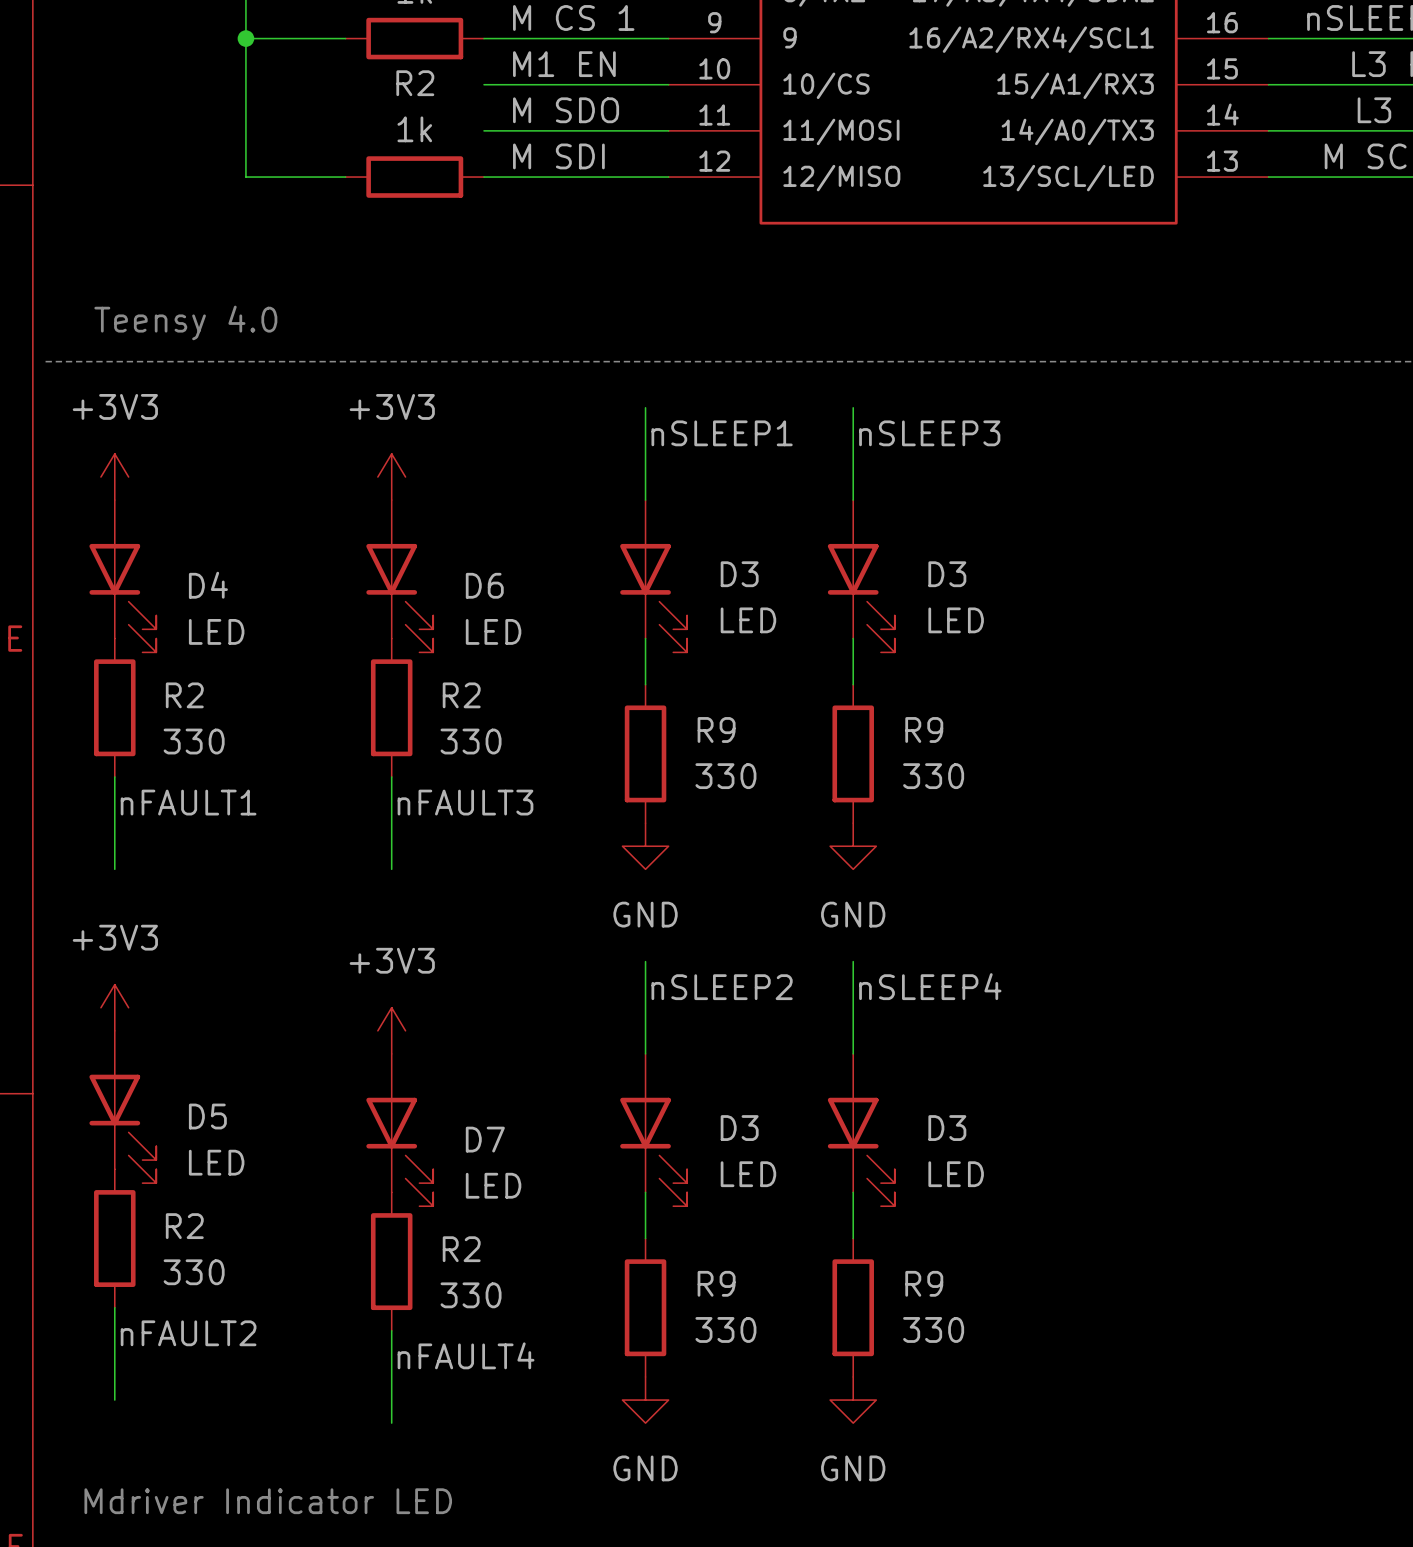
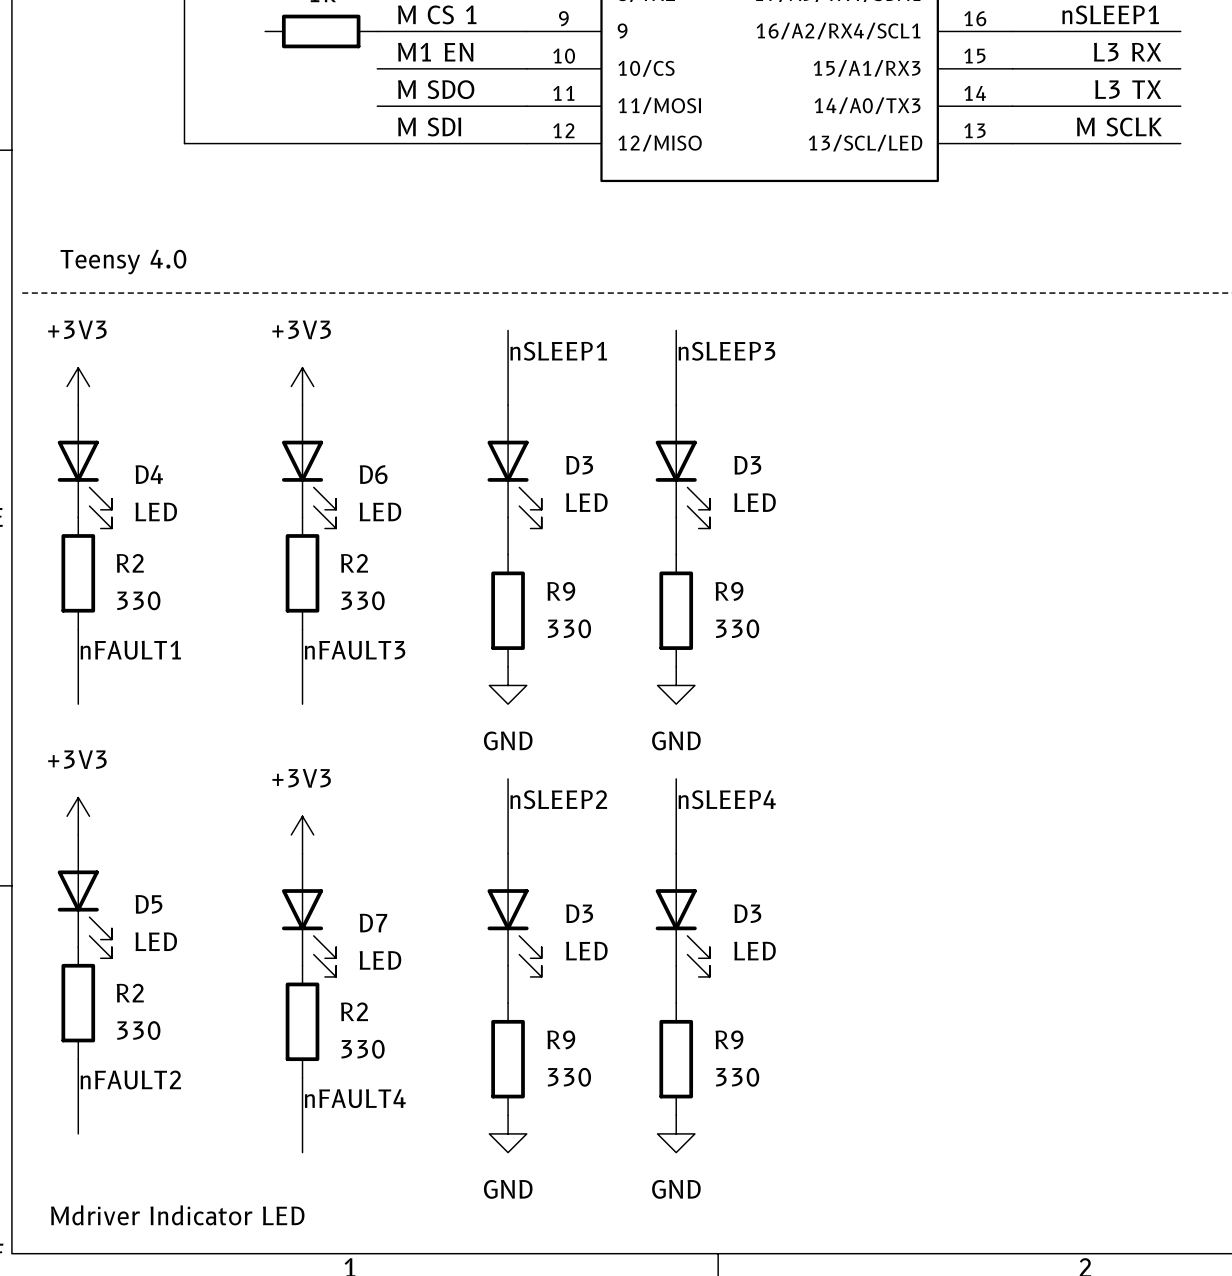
wire: (245, 38) (345, 38) -> none
junction: (245, 38) -> none
wire: none -> (265, 143) (377, 143)
R2: 1k (414, 177) -> none

